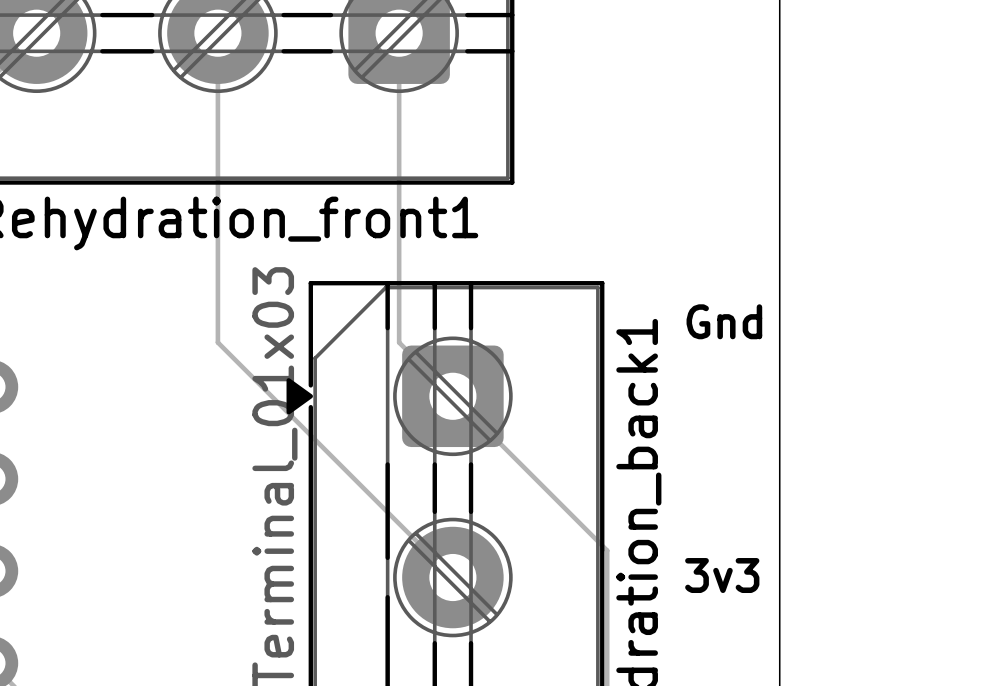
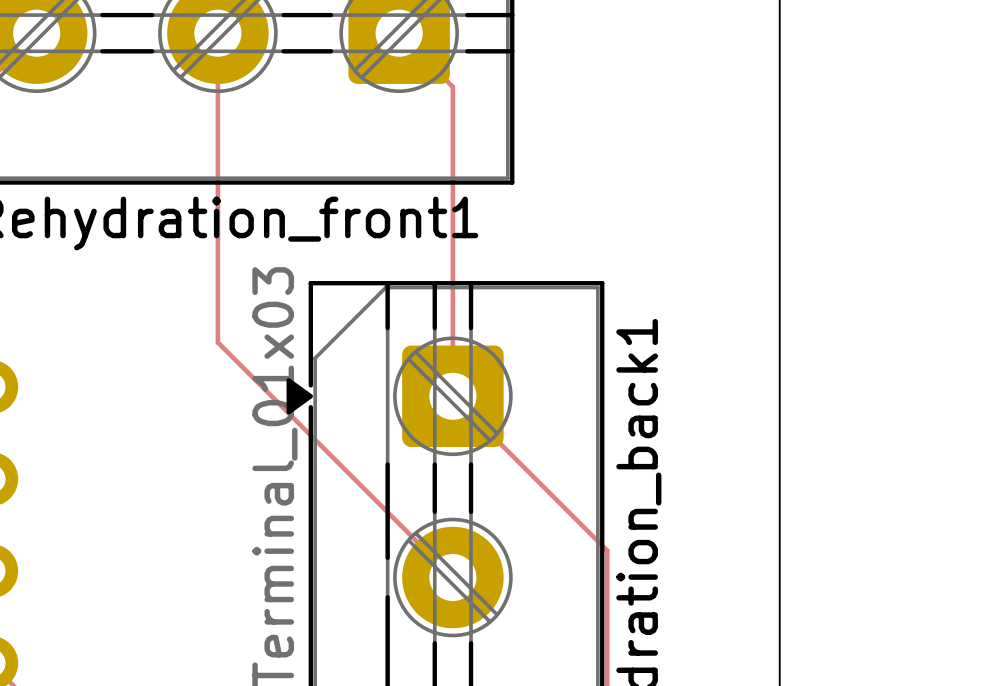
track: (399, 33) (399, 342) (452, 396) -> (399, 33) (452, 86) (452, 396)
text: Gnd (724, 321) -> none
text: 3v3 (722, 575) -> none

